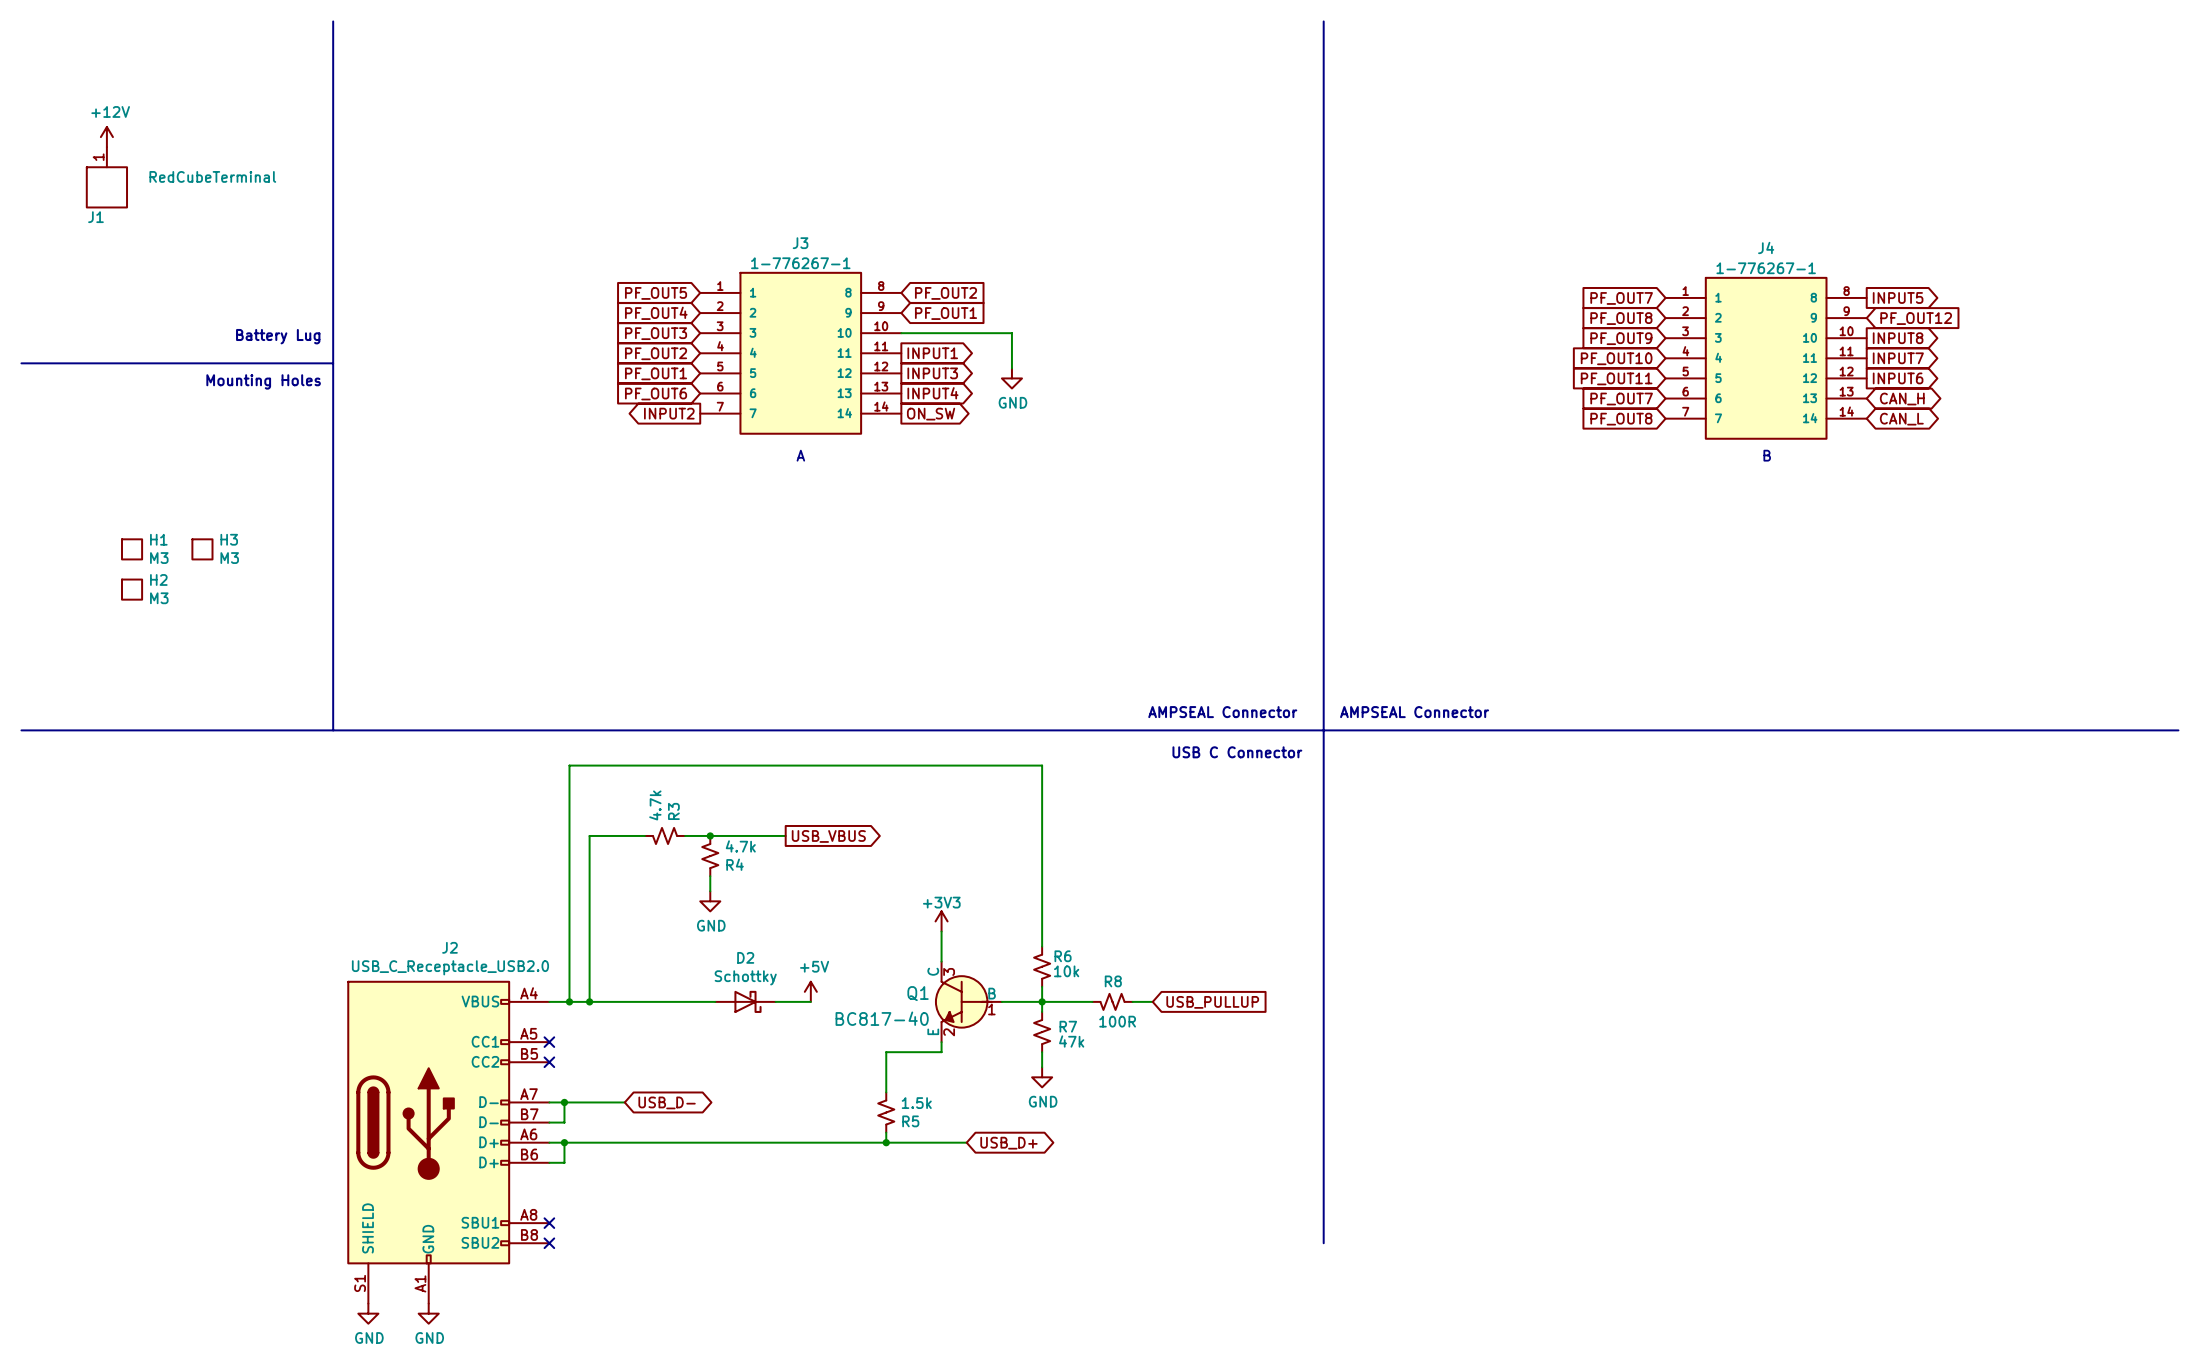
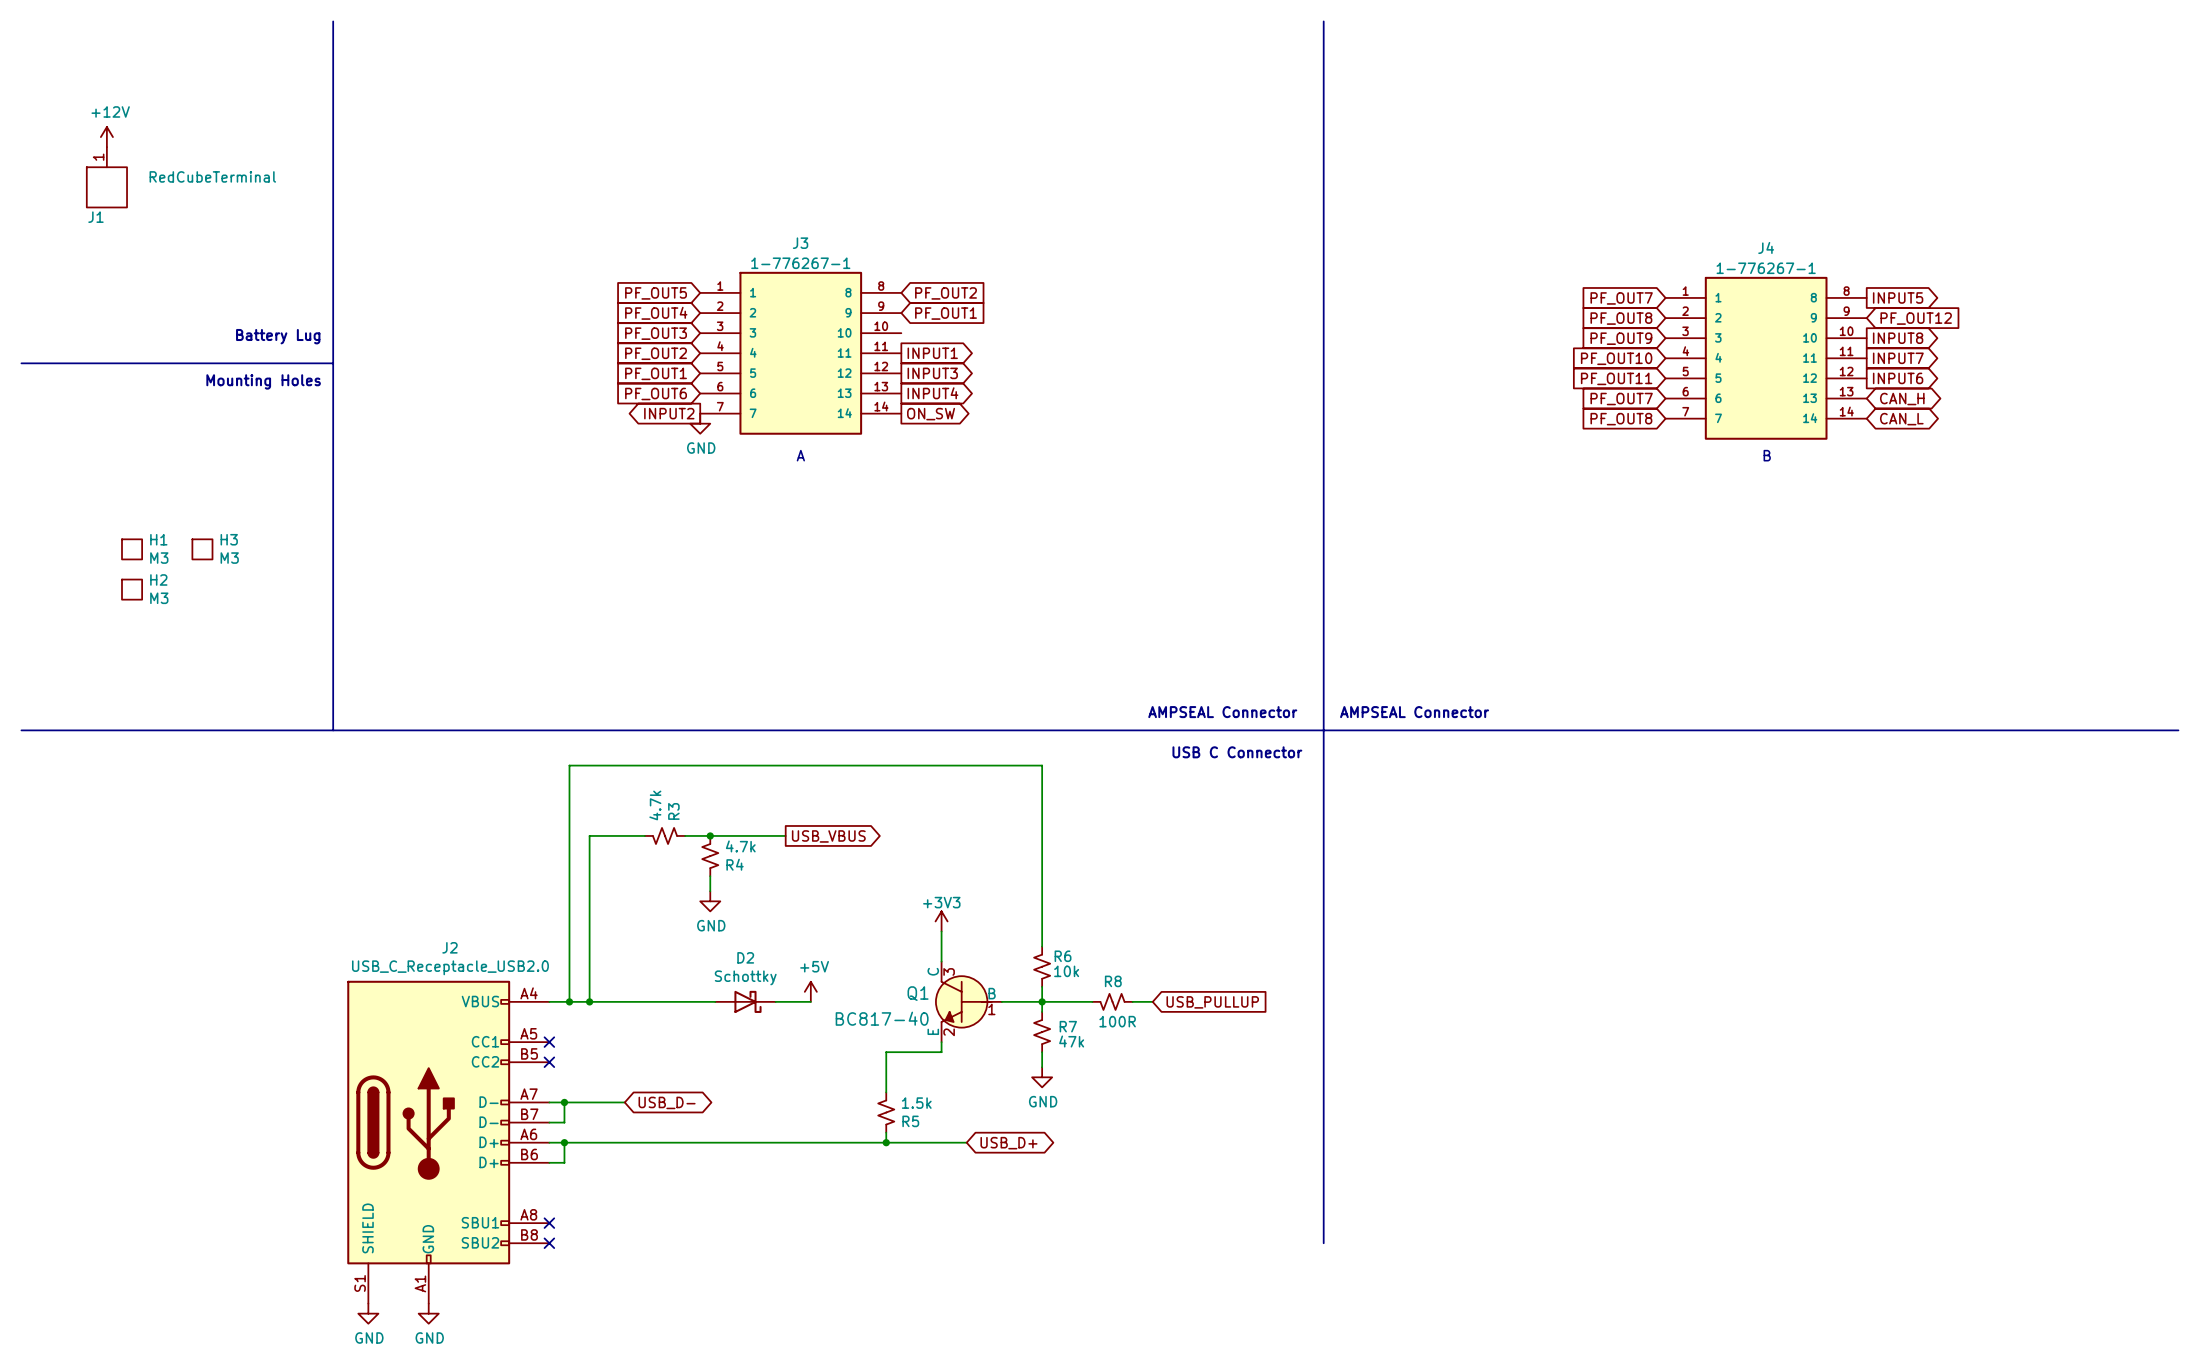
wire: (901, 333) (1011, 333) (1011, 368) -> none
power symbol: GND (1011, 378) -> none
power symbol: none -> GND (700, 423)

